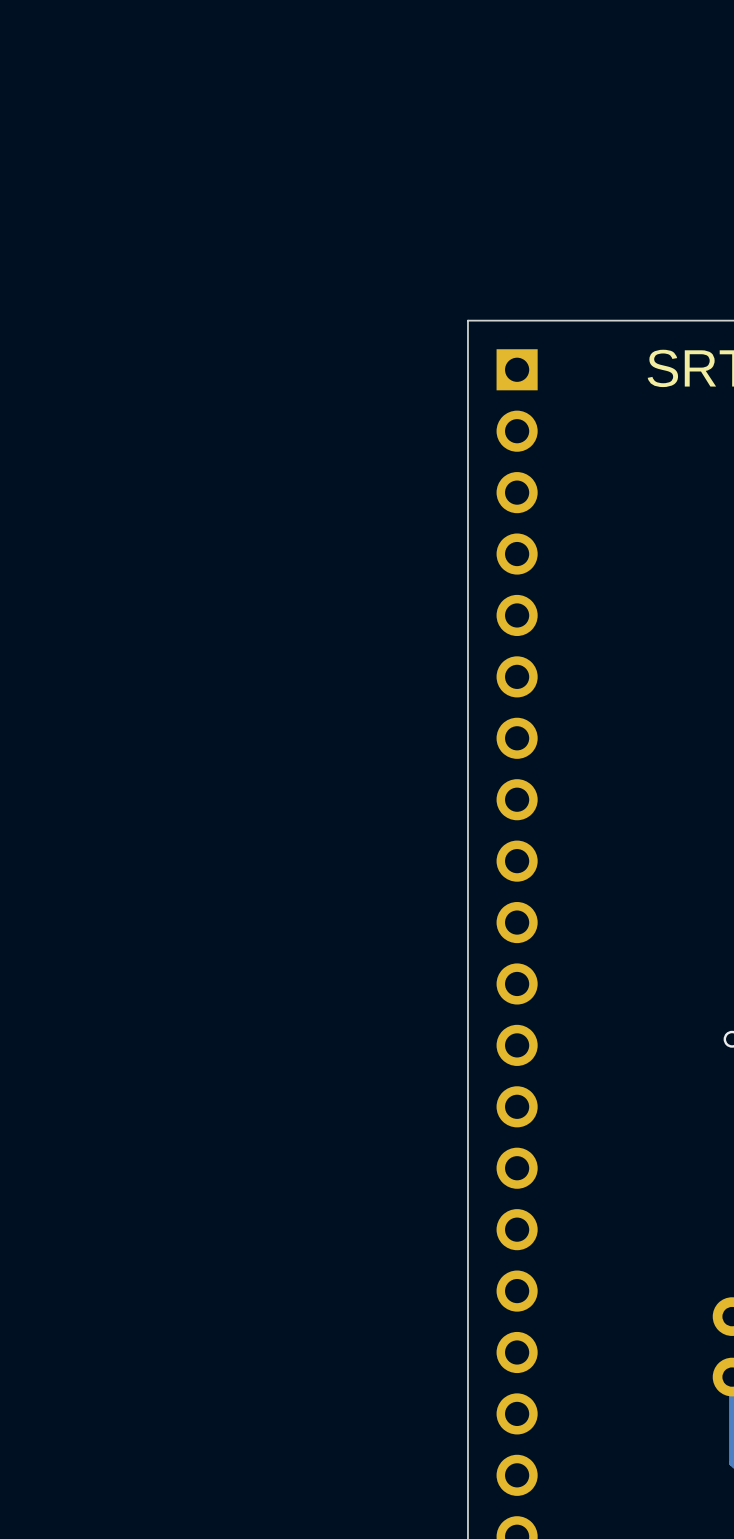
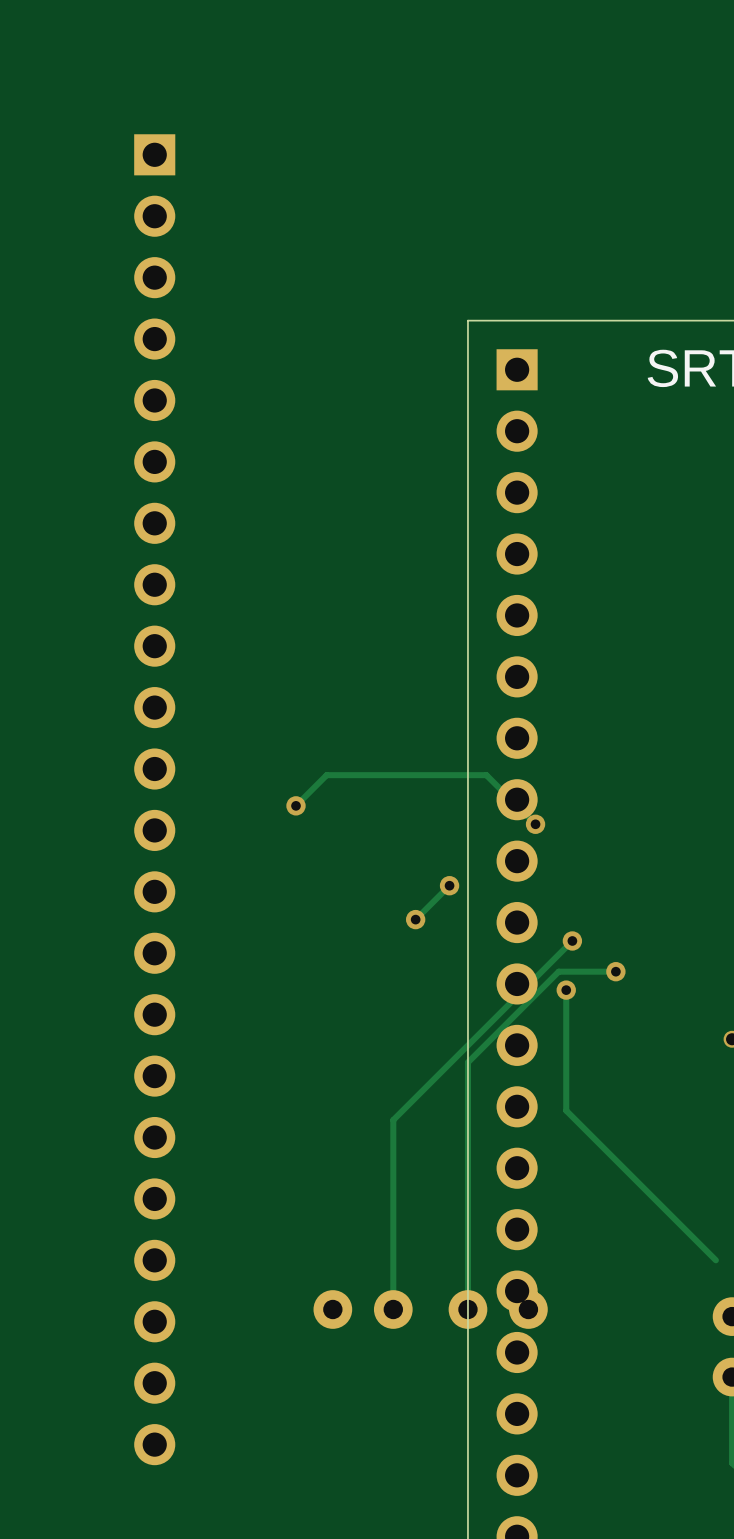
part: none -> (154, 799)
track: none -> (296, 805) (326, 775) (486, 775) (535, 824)
via: none -> (296, 805)
via: none -> (535, 824)
track: none -> (449, 885) (415, 919)
via: none -> (449, 885)
via: none -> (415, 919)
track: none -> (572, 940) (393, 1120) (393, 1309)
via: none -> (572, 940)
track: none -> (615, 971) (558, 971) (467, 1062) (467, 1309)
via: none -> (615, 971)
track: none -> (566, 990) (566, 1110) (715, 1260)
via: none -> (566, 990)
part: none -> (363, 1309)
part: none -> (498, 1309)

